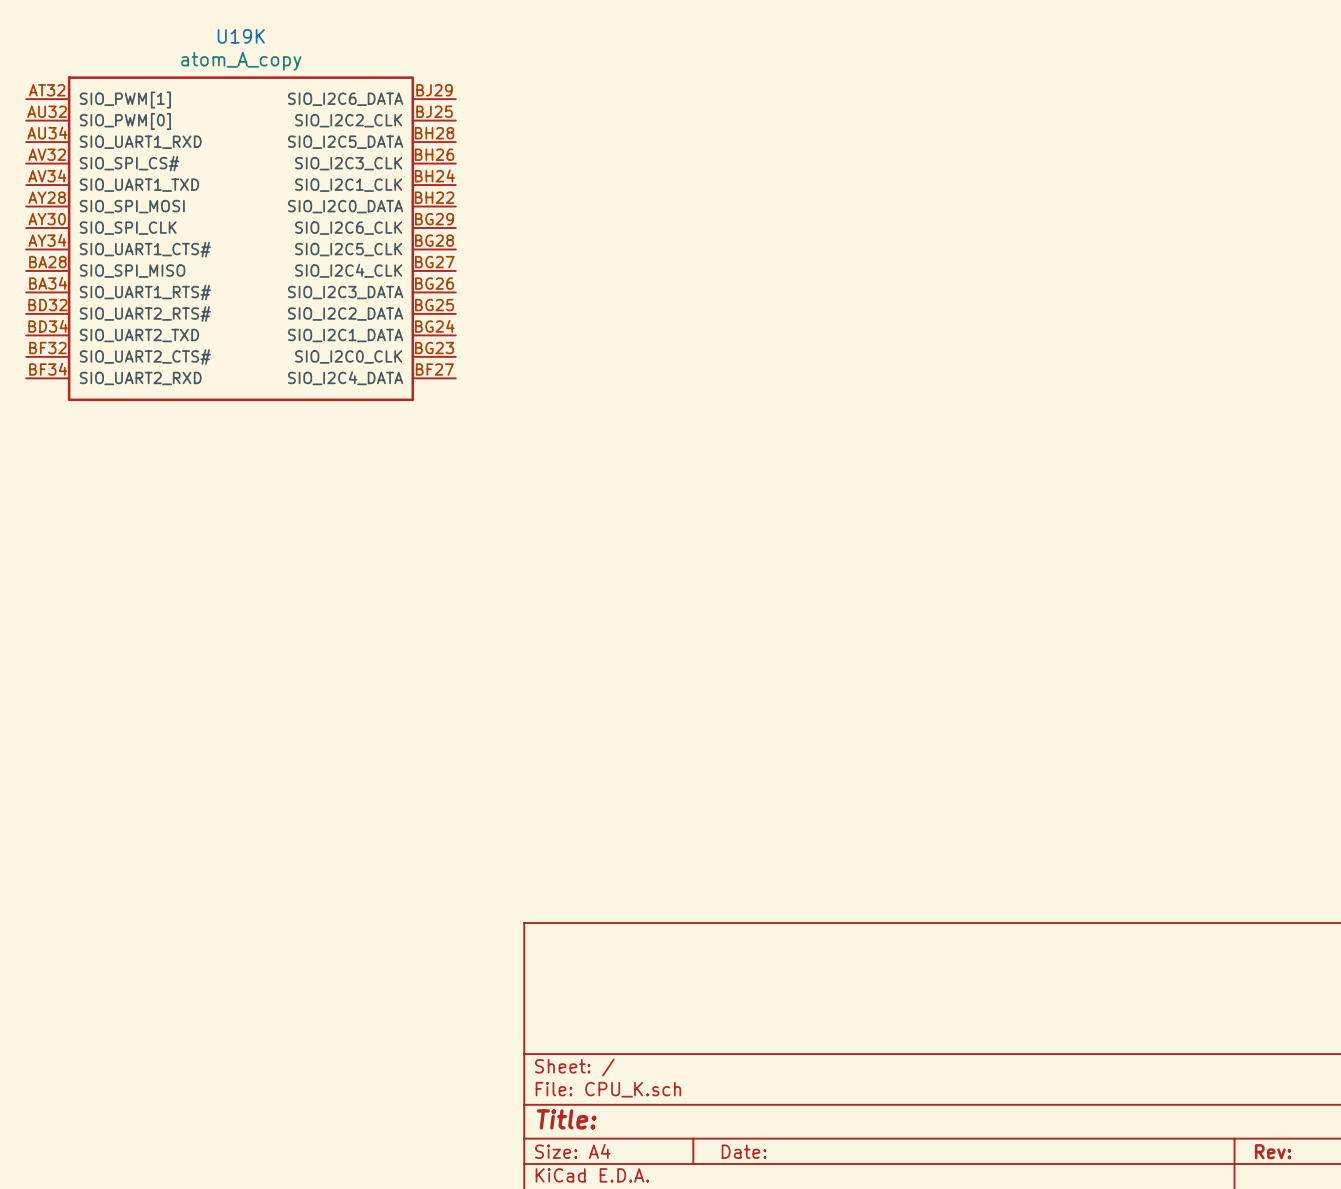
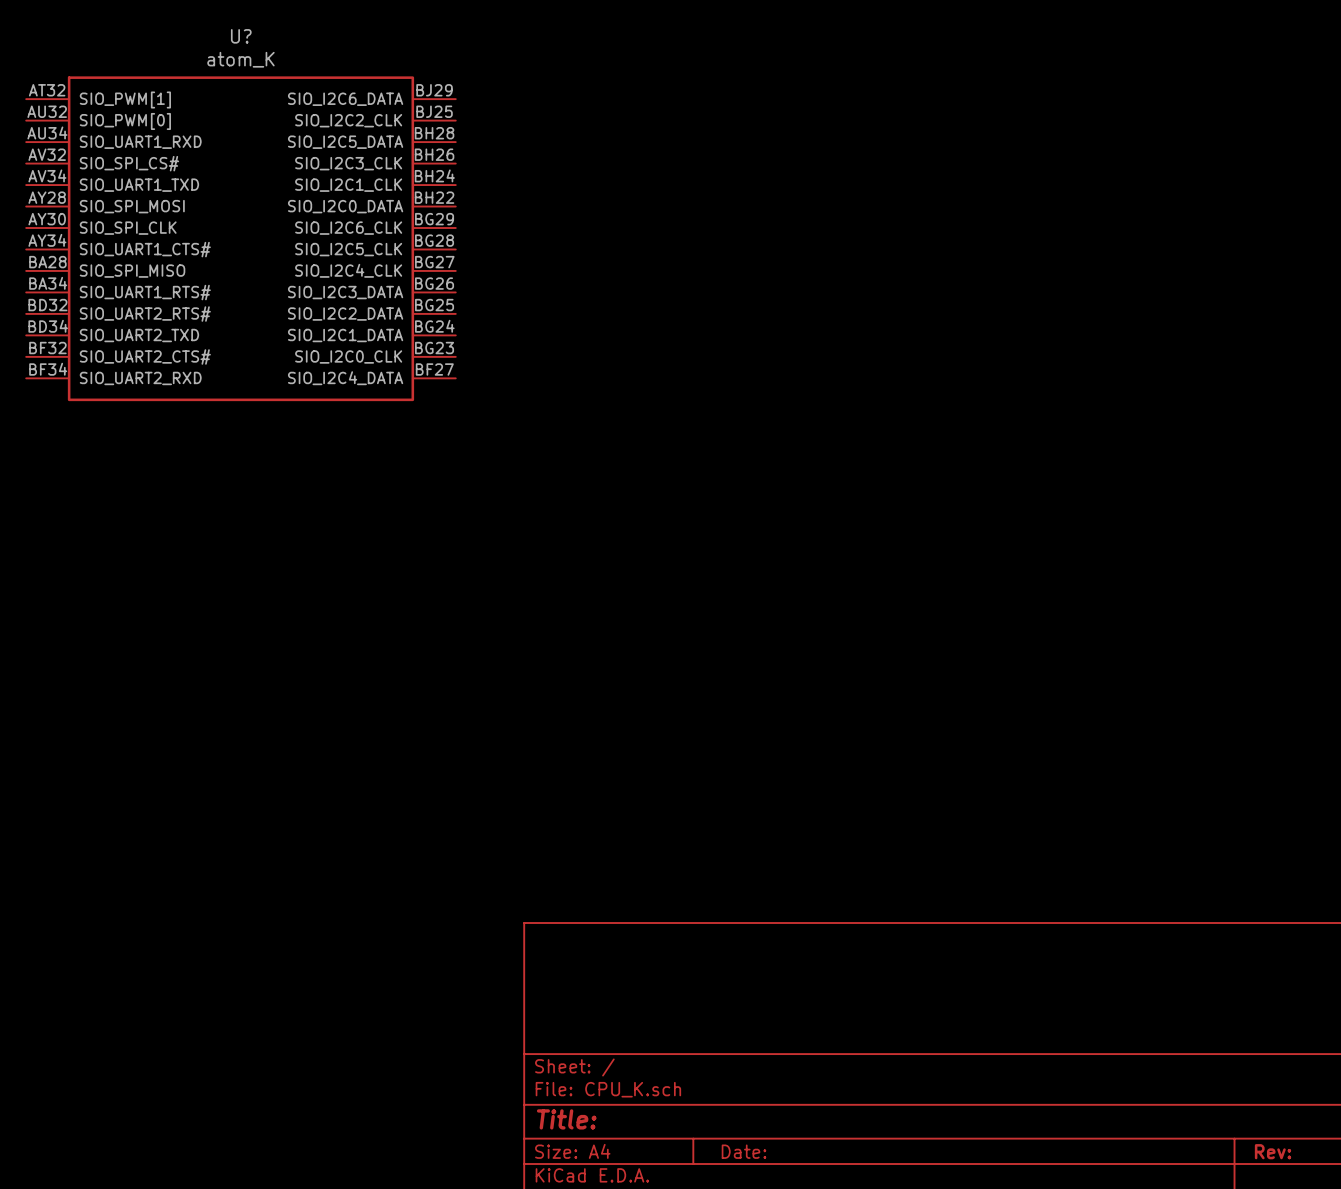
U19K name: U19K (241, 36) -> U? (241, 36)
U19K value: atom_A_copy (241, 61) -> atom_K (240, 59)

